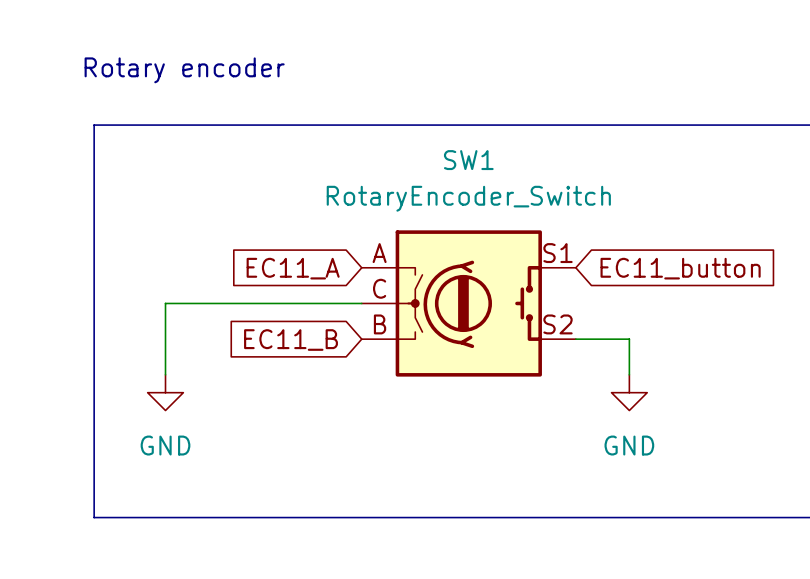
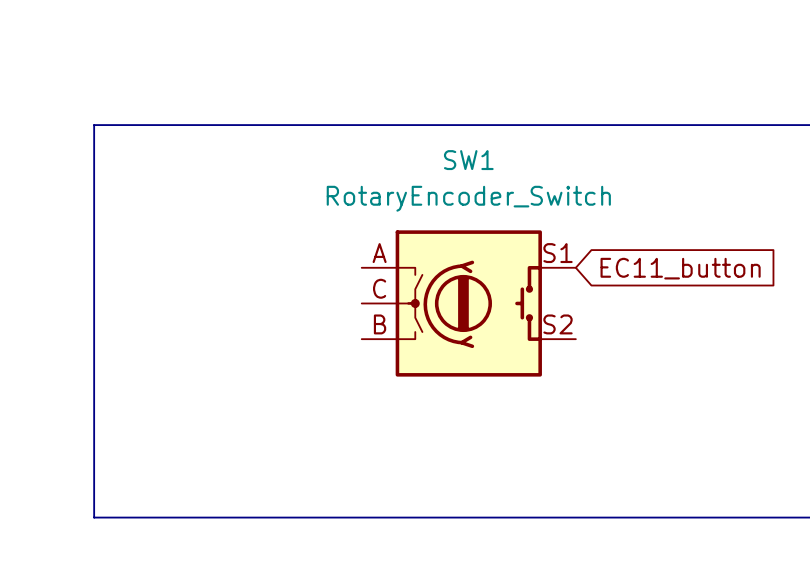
text: Rotary encoder (184, 70) -> none
global label: EC11_A (293, 268) -> none
wire: (361, 303) (165, 303) (165, 374) -> none
wire: (575, 339) (629, 339) (629, 374) -> none
global label: EC11_B (291, 340) -> none
power symbol: GND (165, 392) -> none
power symbol: GND (629, 392) -> none

